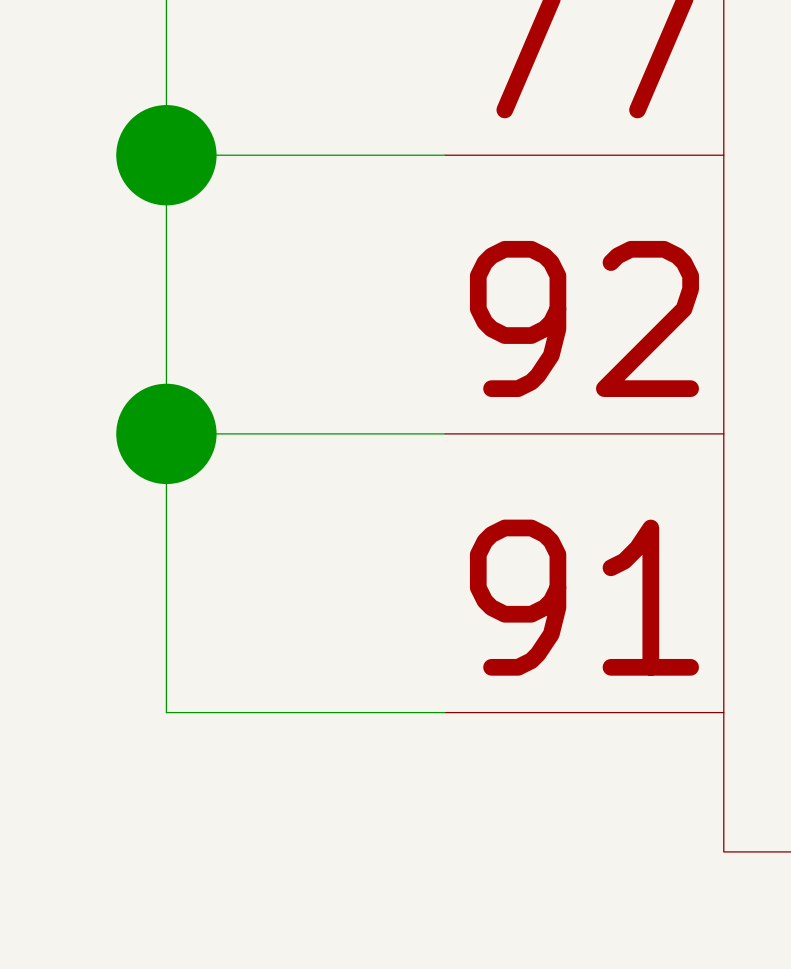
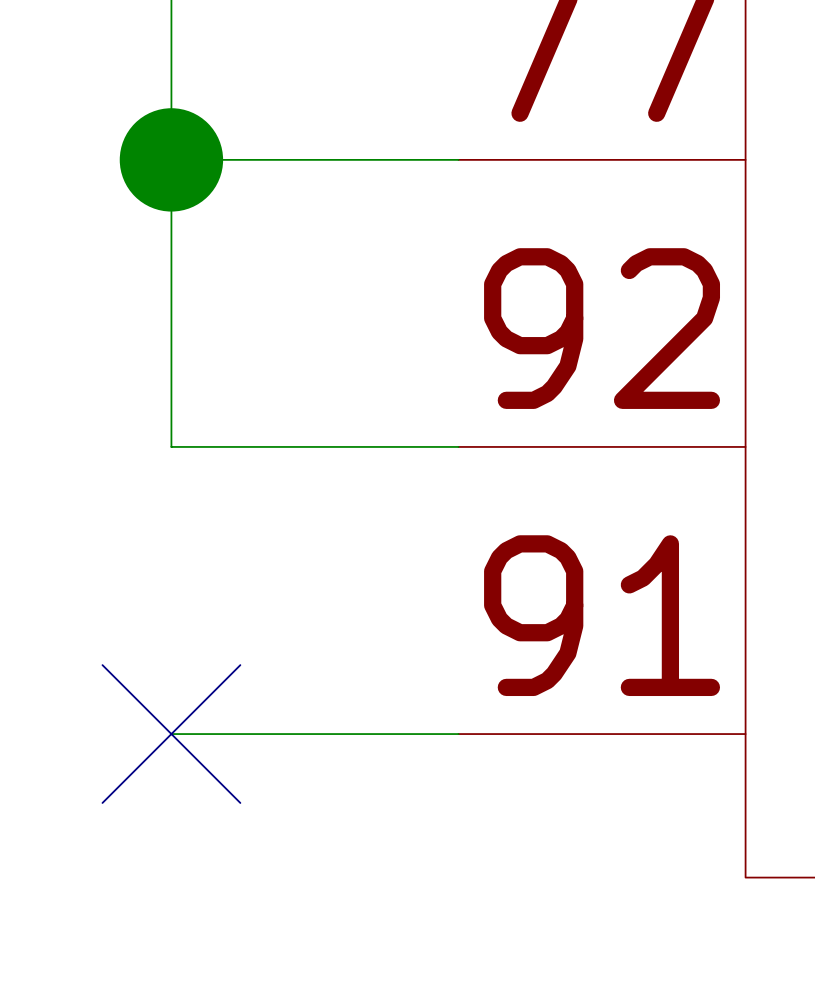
wire: (166, 433) (166, 712) -> none
junction: (166, 433) -> none
no-connect mark: none -> (171, 734)

